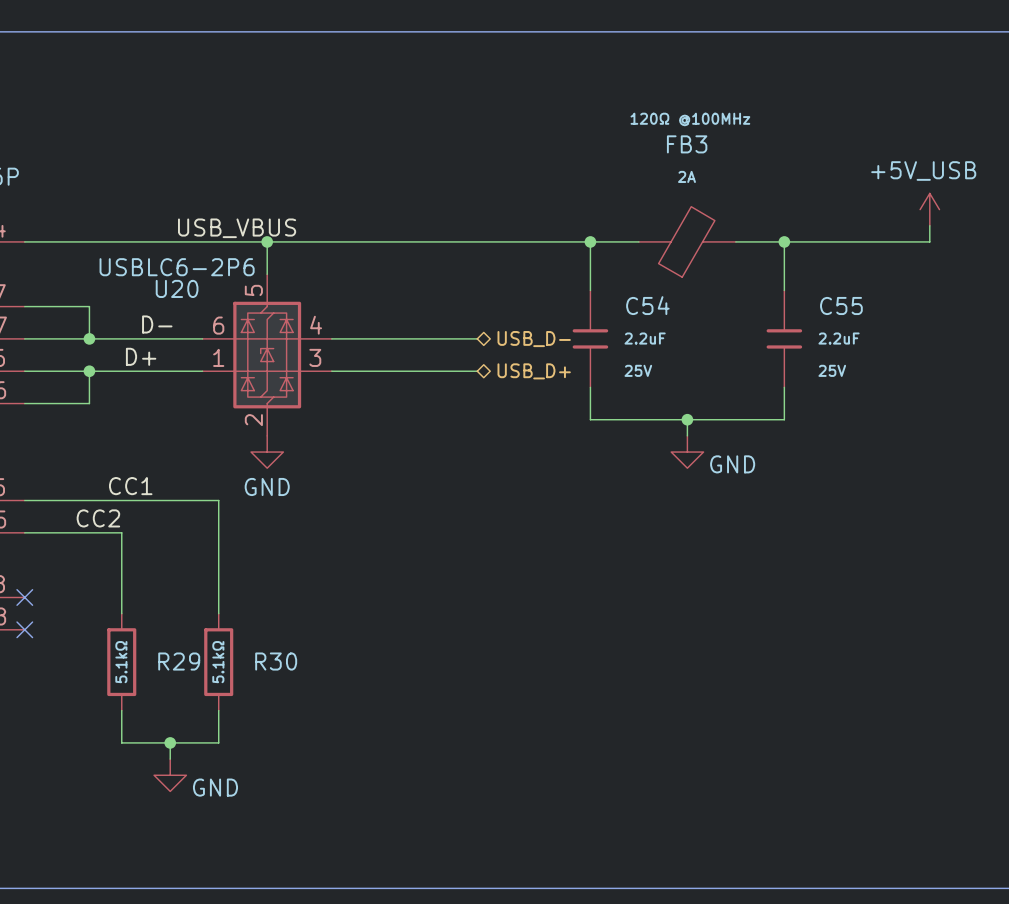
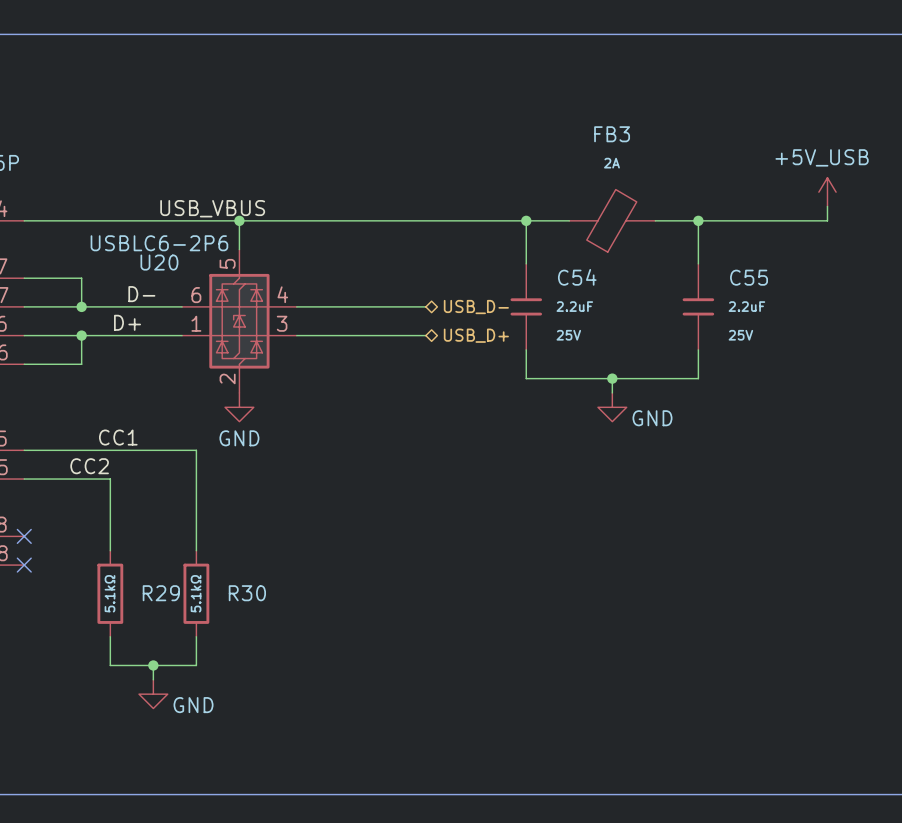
FB3 value: 120Ω @100MHz (690, 119) -> none

